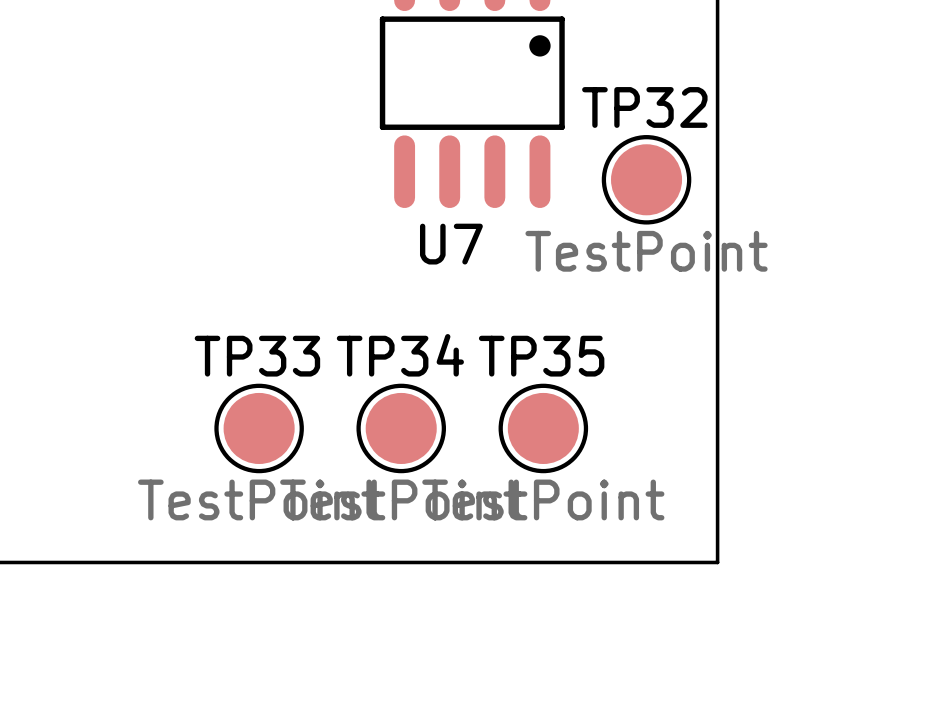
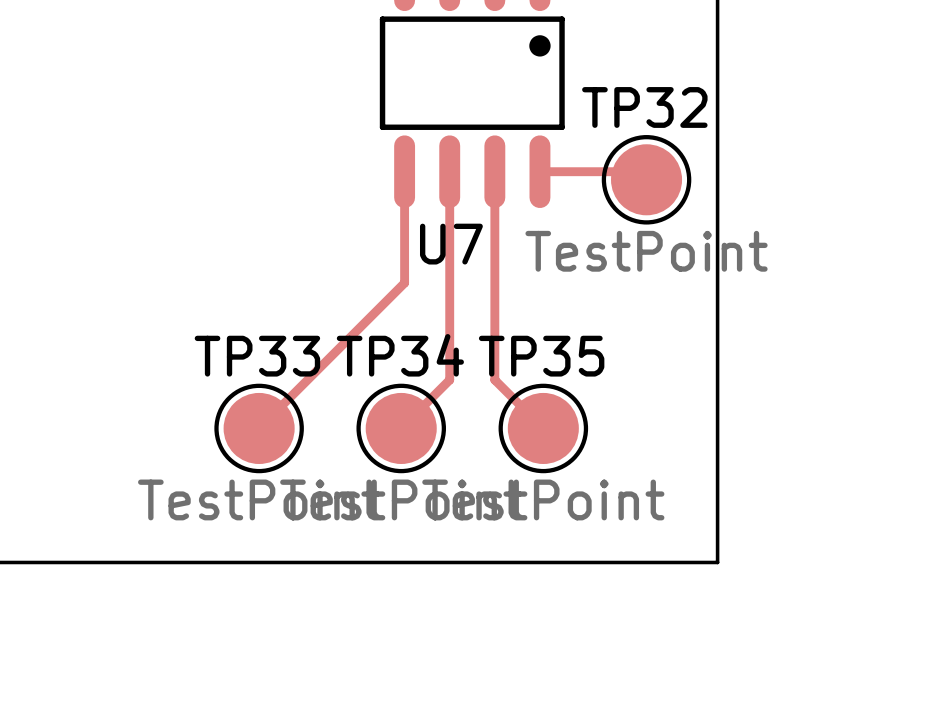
track: none -> (404, 171) (404, 282) (259, 428)
track: none -> (449, 171) (449, 379) (401, 428)
track: none -> (494, 171) (494, 379) (543, 428)
track: none -> (539, 171) (638, 171) (646, 179)

